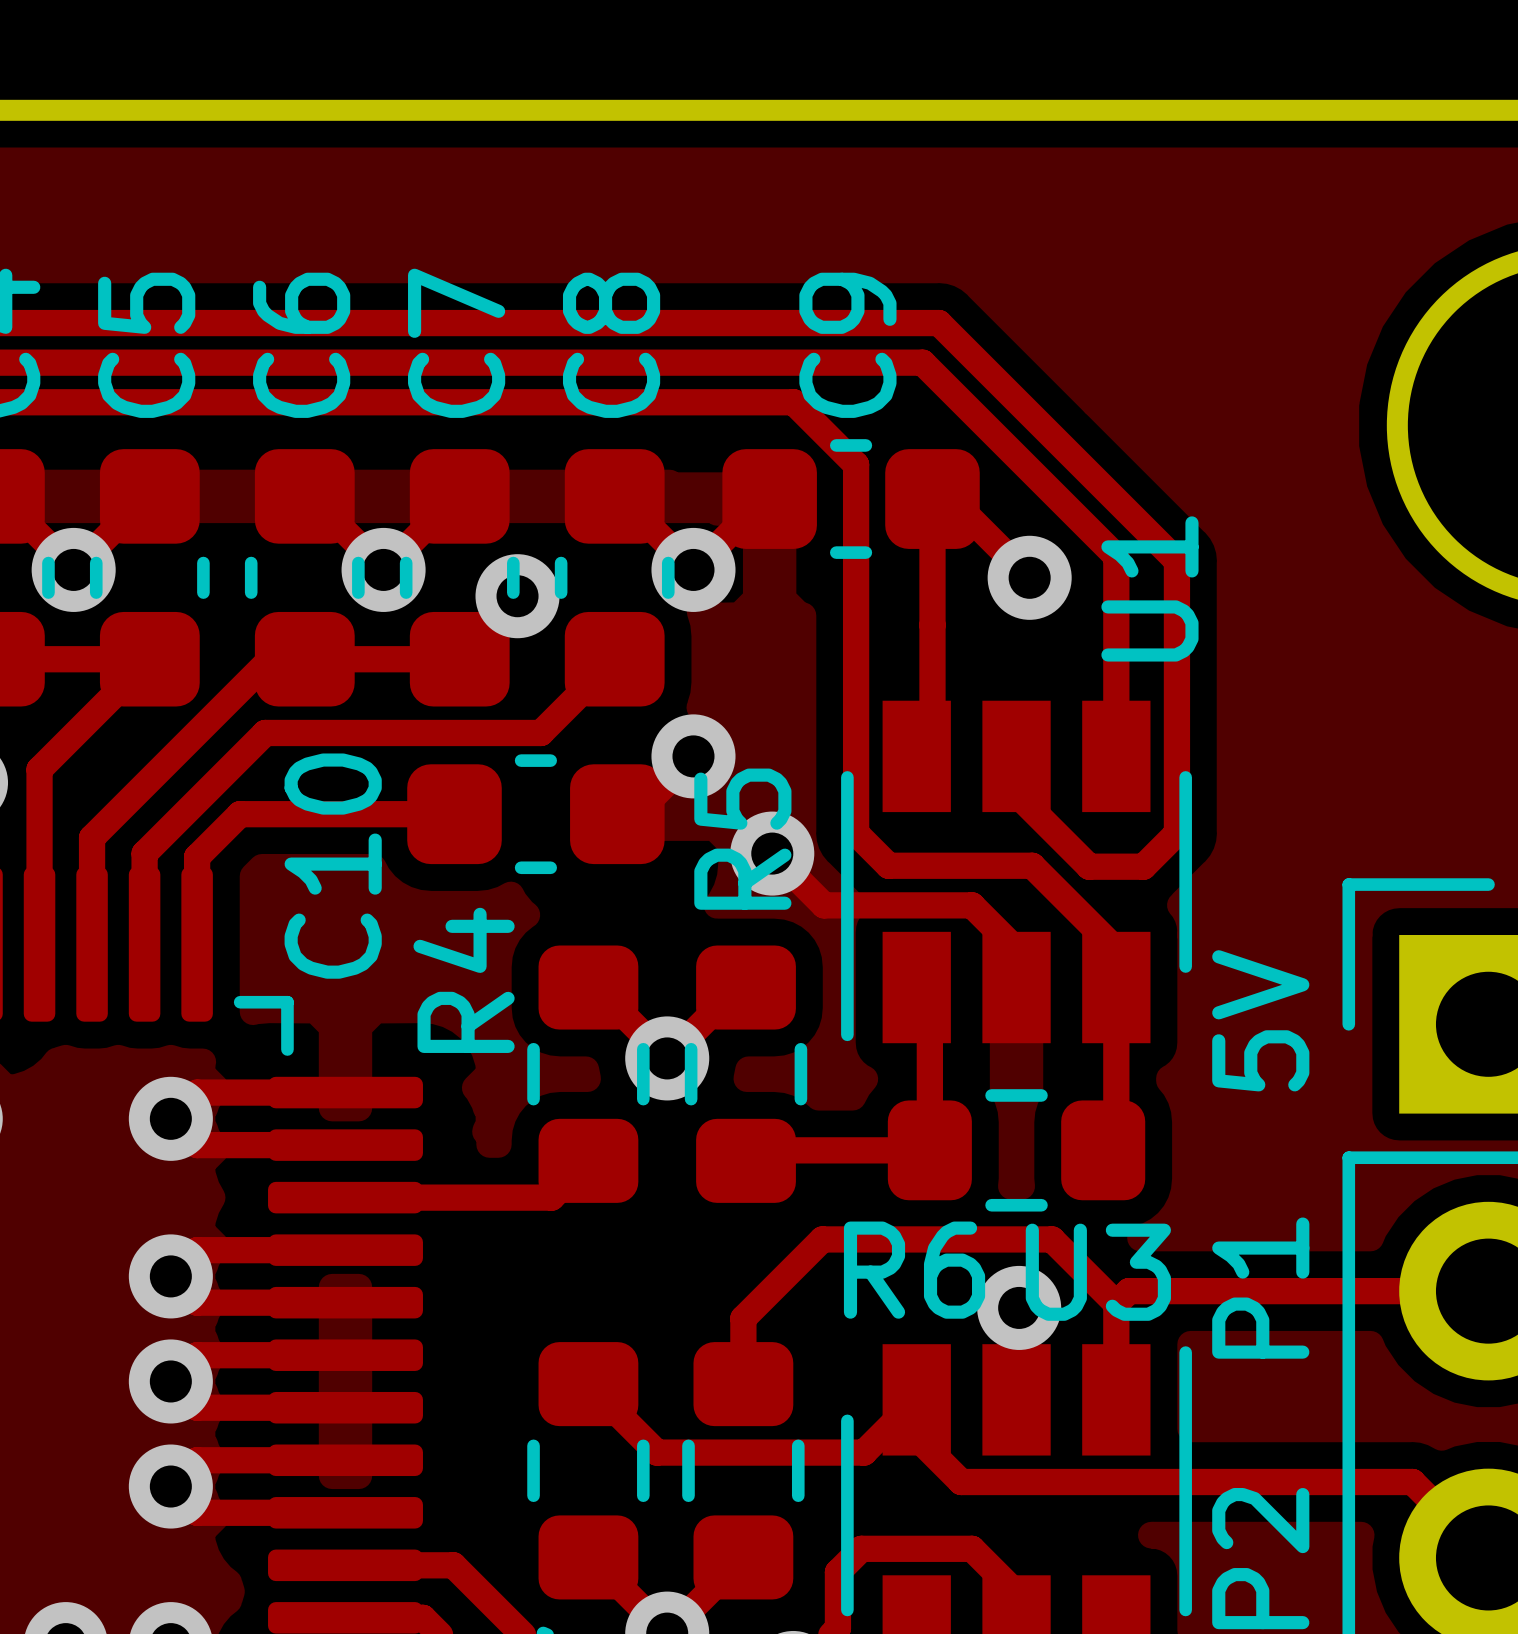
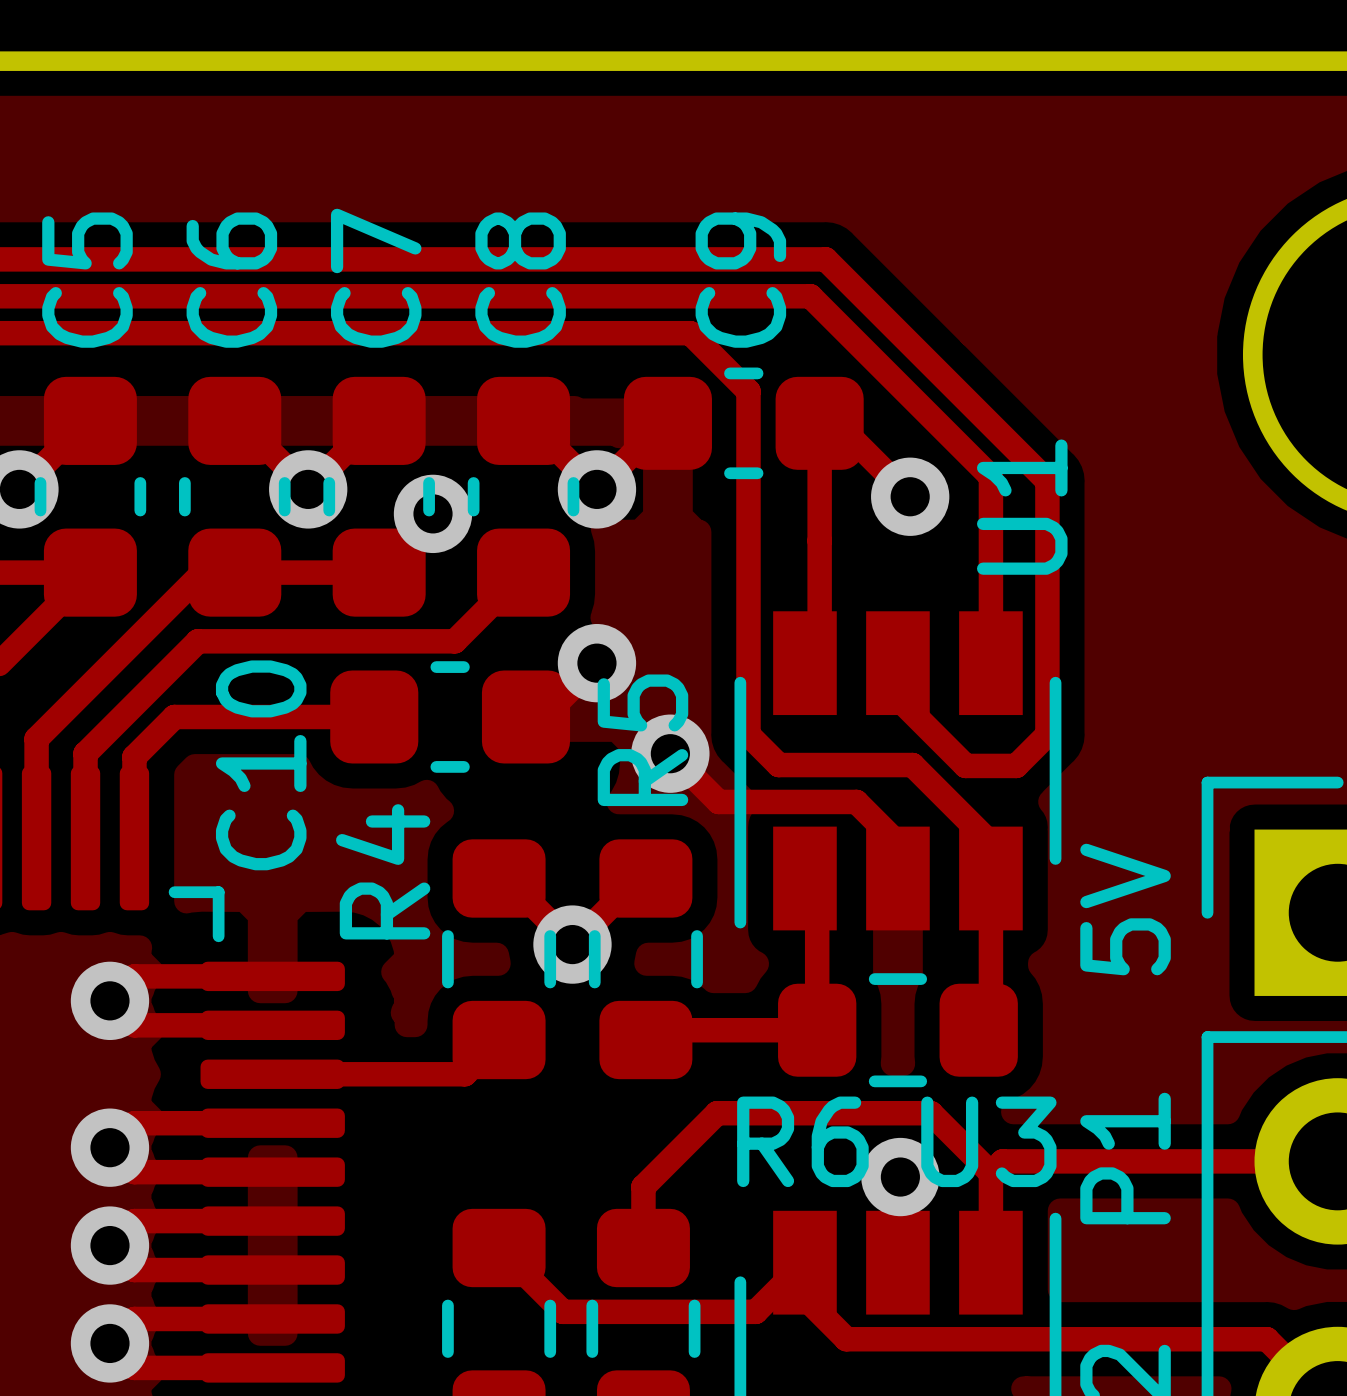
U3 name position: U3 (1098, 1272) -> U3 (988, 1141)

